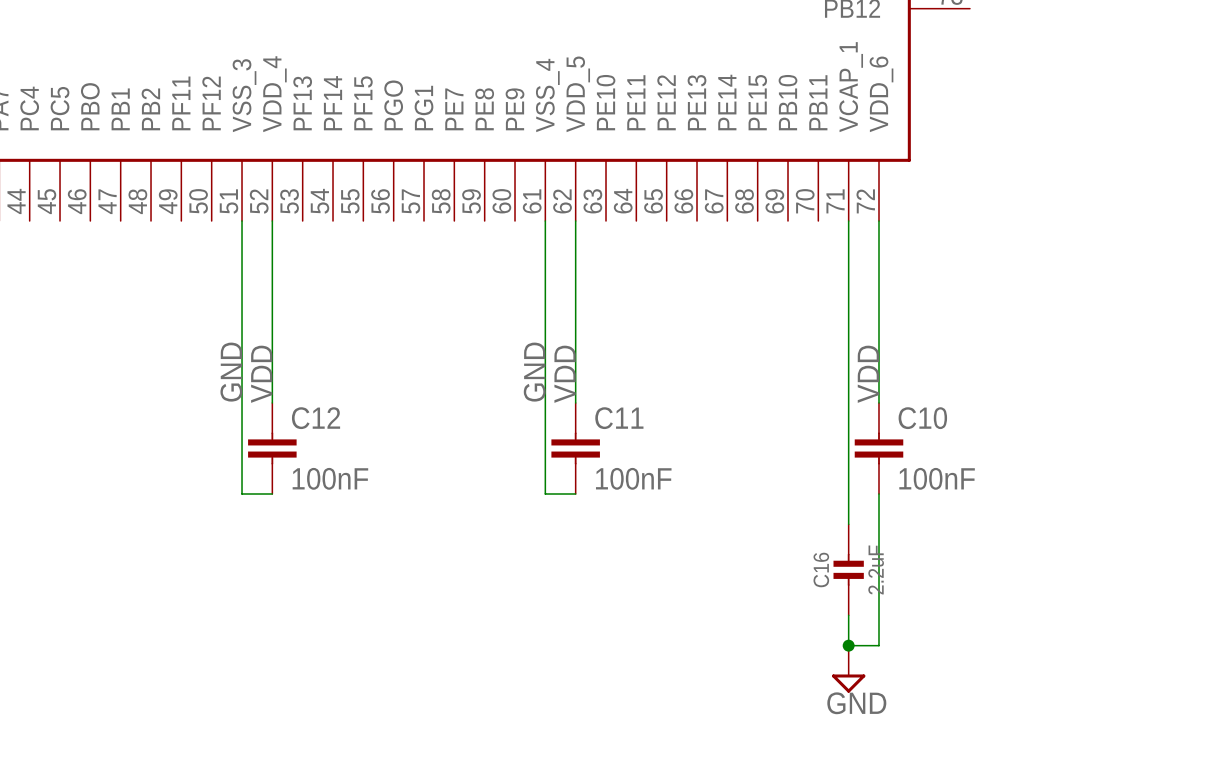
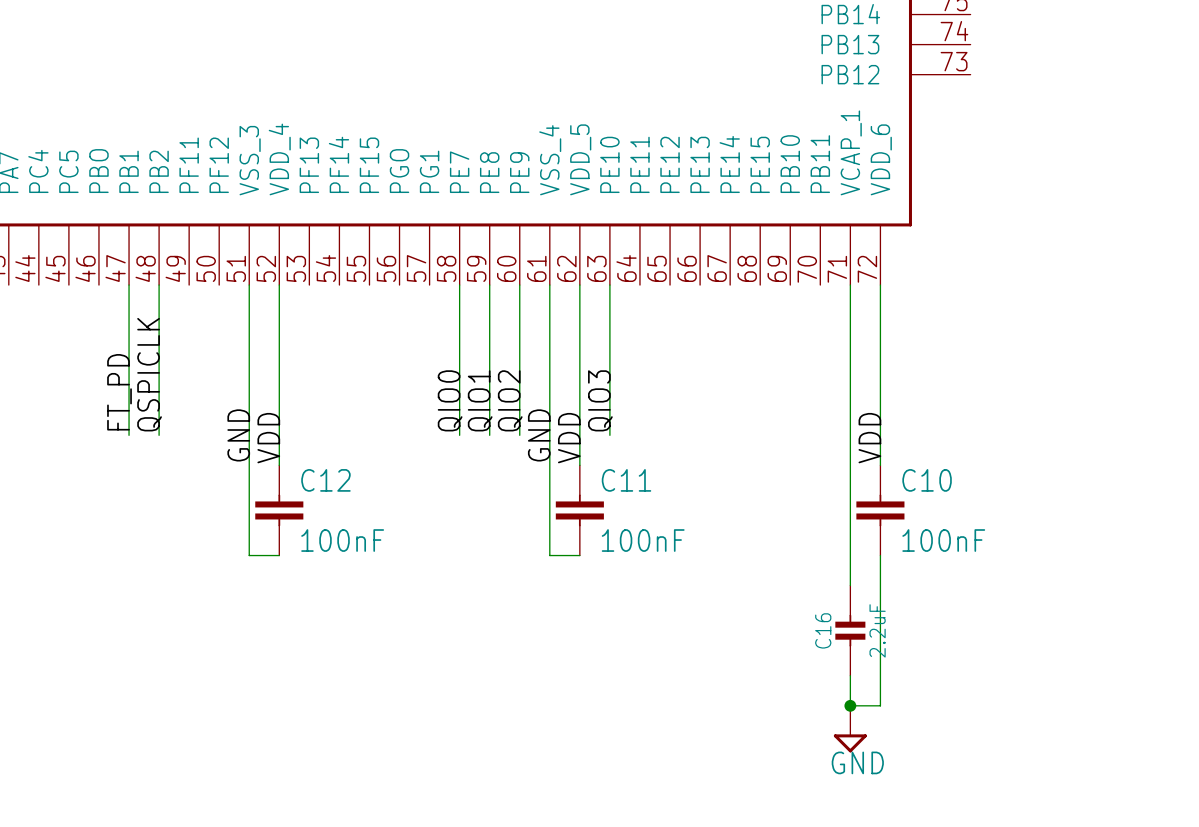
wire: none -> (129, 285) (129, 435)
wire: none -> (159, 285) (159, 435)
wire: none -> (459, 285) (459, 435)
wire: none -> (489, 285) (489, 435)
wire: none -> (519, 285) (519, 435)
wire: none -> (609, 285) (609, 435)
label: none -> QSPICLK (149, 374)
label: none -> FT_PD (119, 392)
label: none -> QIO0 (450, 400)
label: none -> QIO1 (480, 400)
label: none -> QIO2 (510, 400)
label: none -> QIO3 (600, 400)

